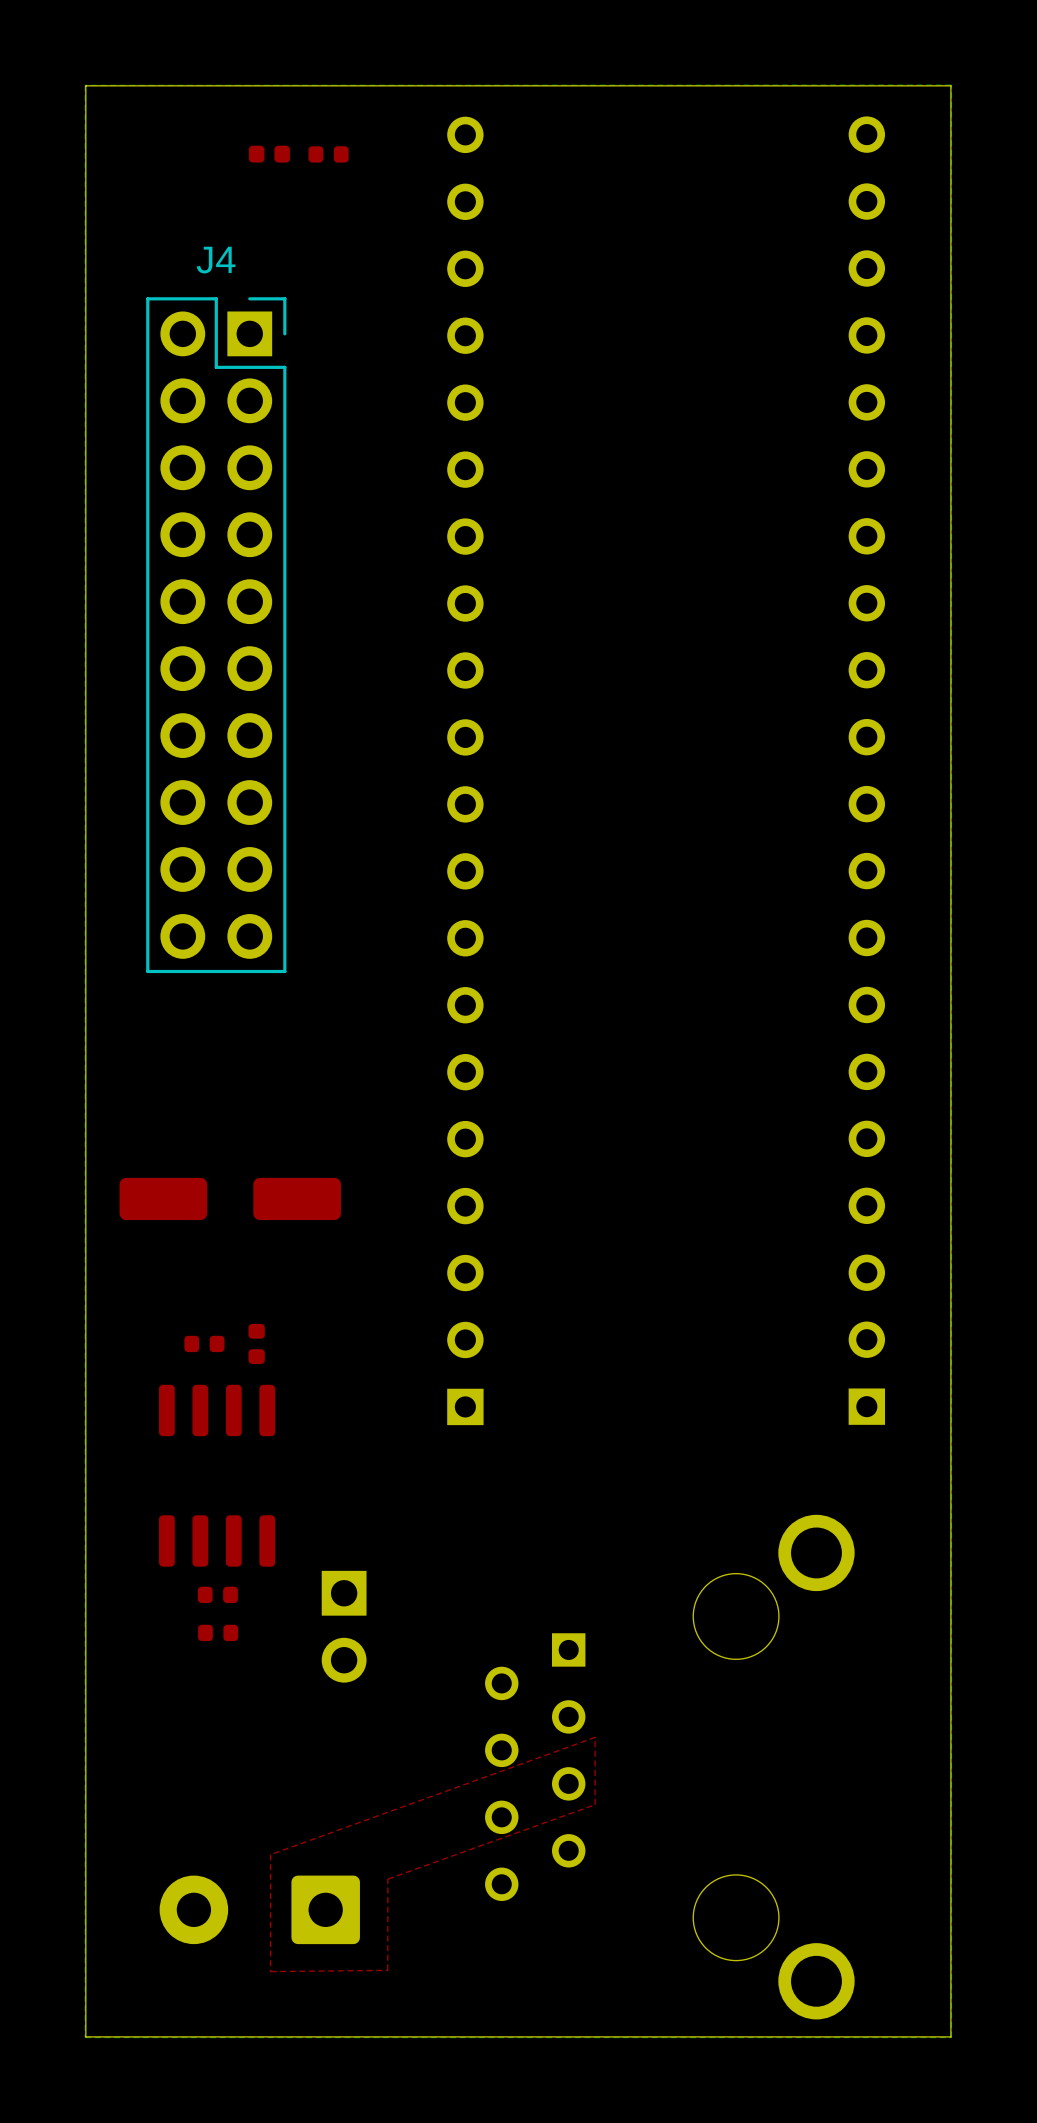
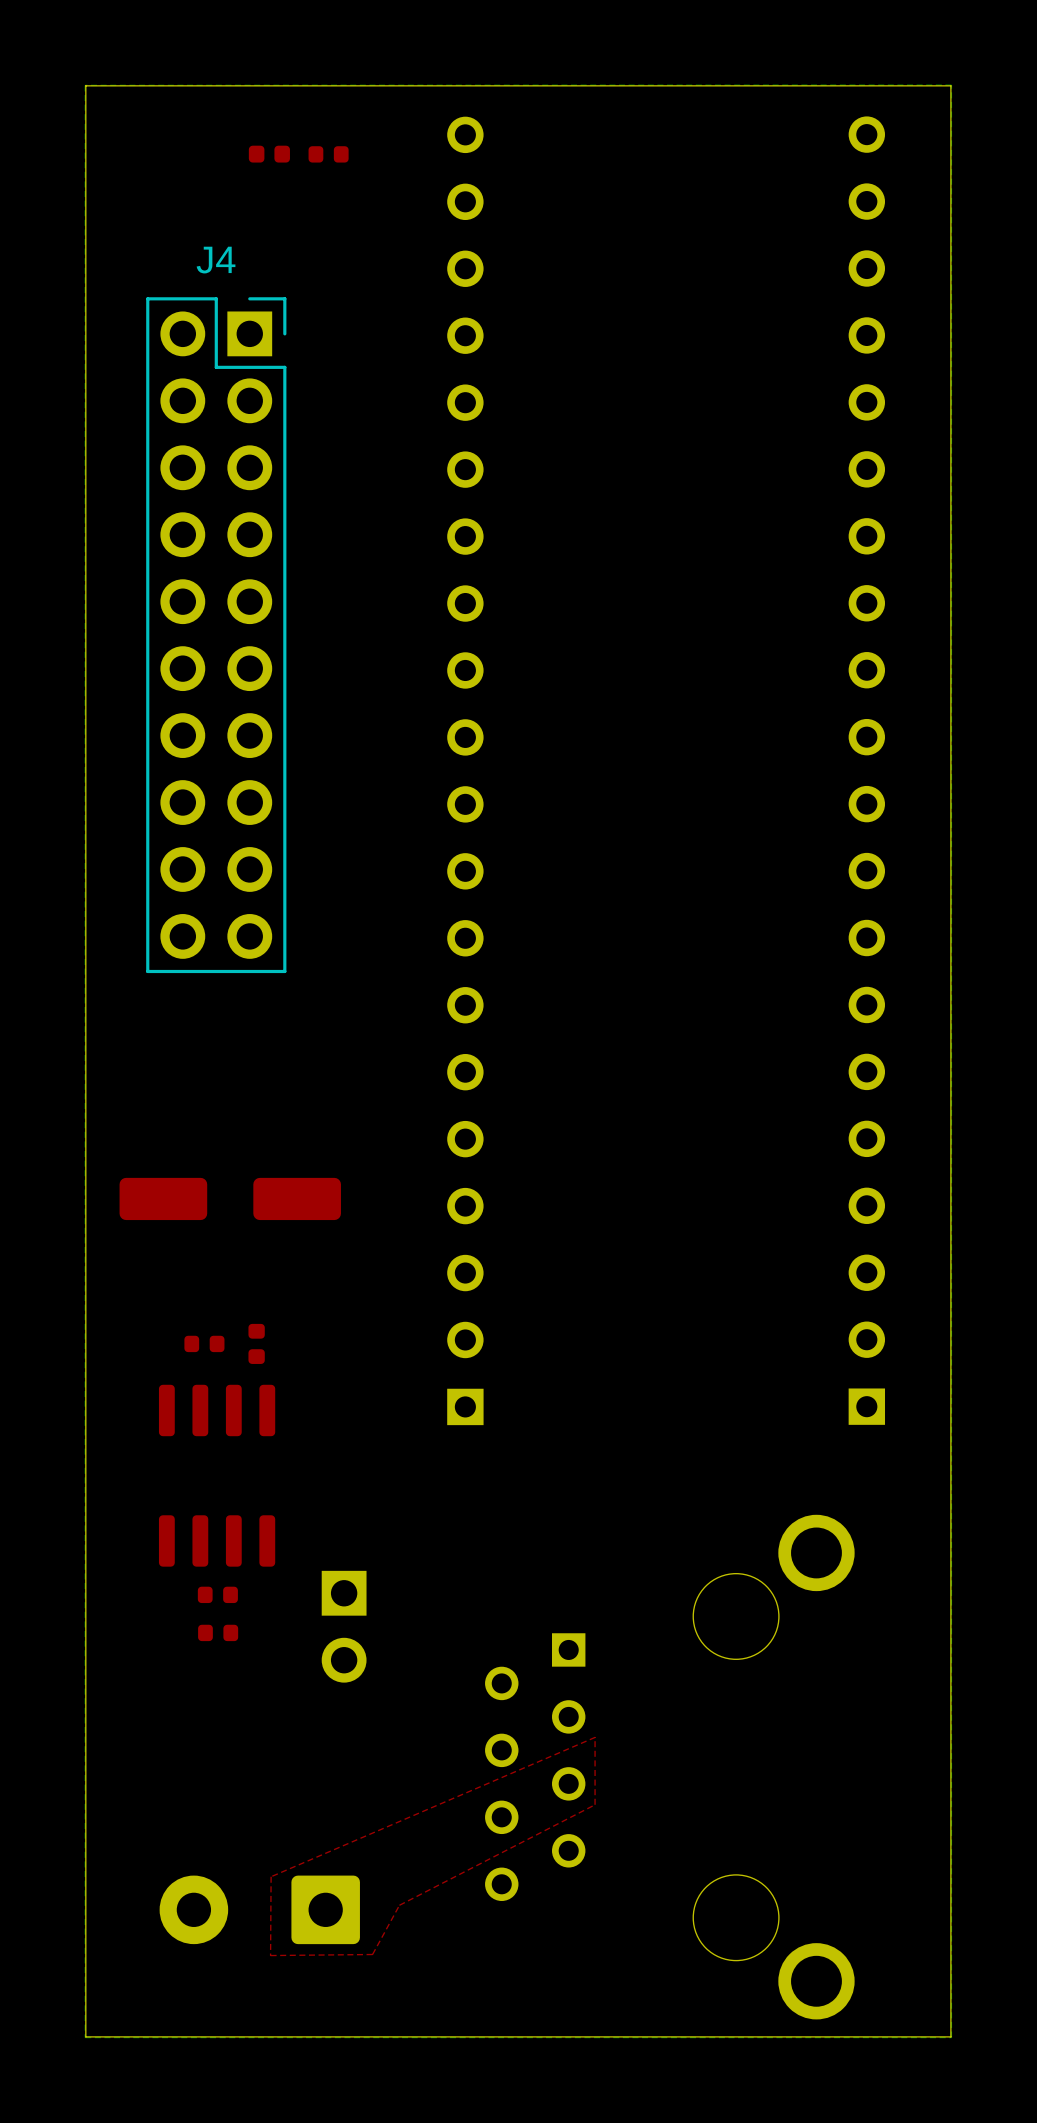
top zone outline: (595, 1737) (270, 1854) (270, 1971) (387, 1970) (387, 1879) (595, 1804) -> (595, 1737) (271, 1876) (270, 1955) (372, 1954) (399, 1905) (595, 1804)

